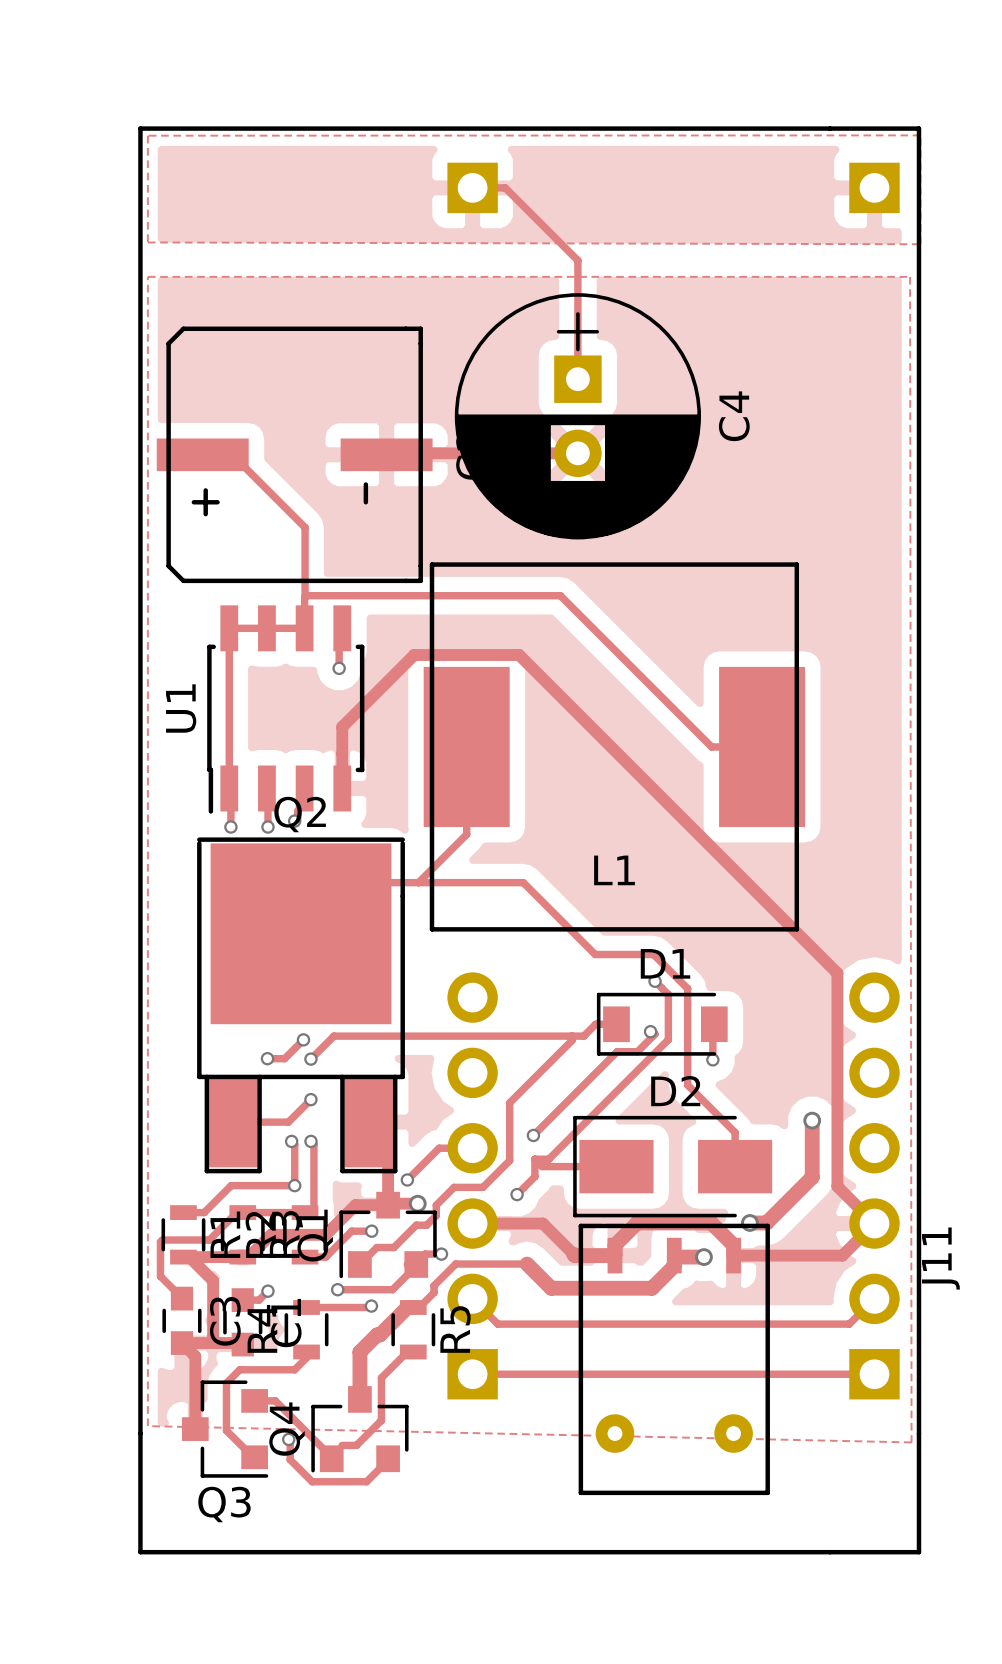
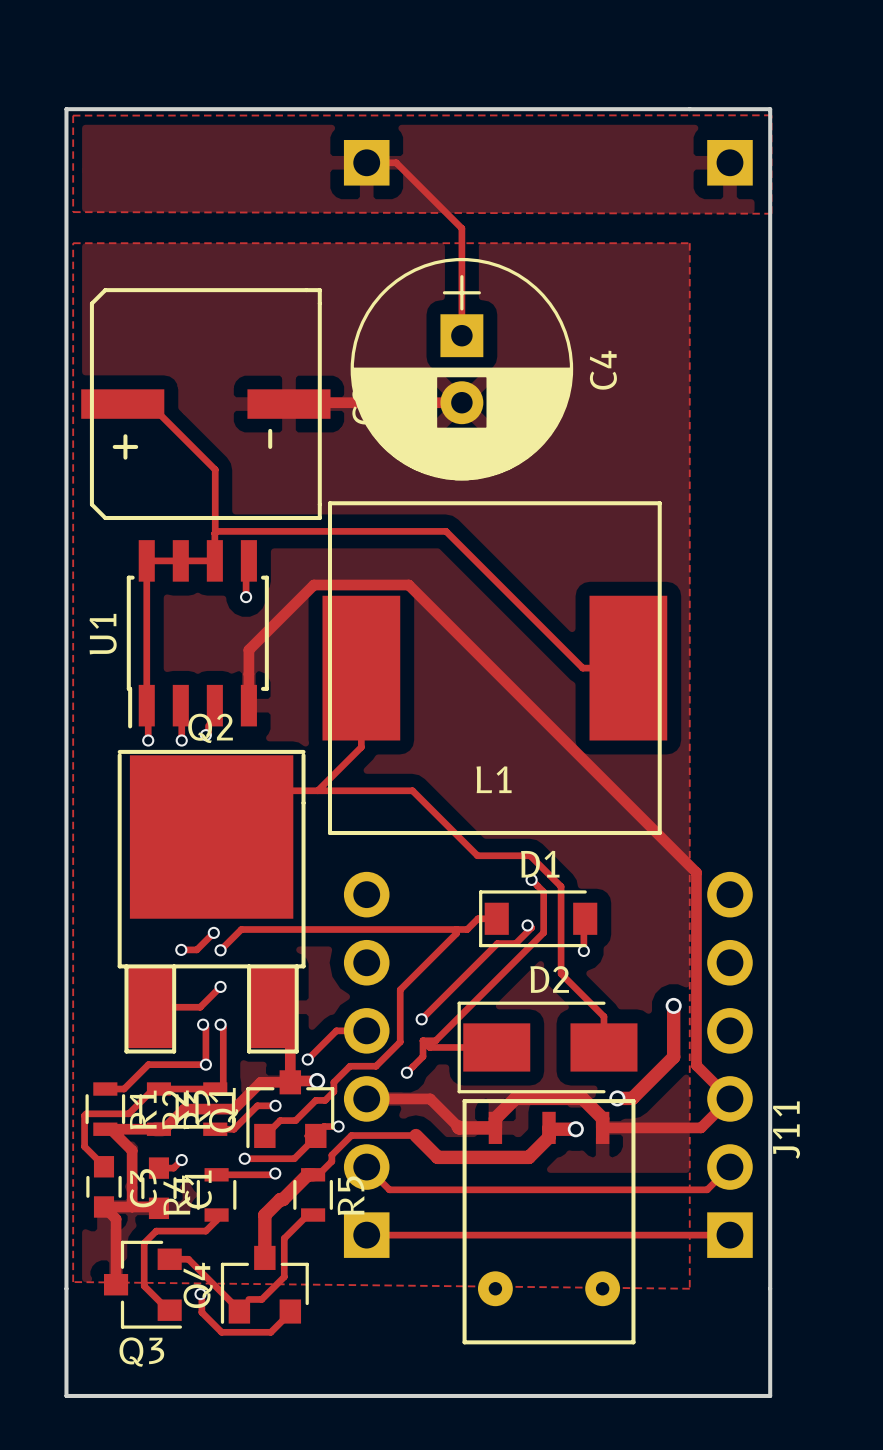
zone outline: (830, 276) (910, 276) (911, 1442) (147, 1426) -> (689, 243) (689, 1288) (73, 1282)

